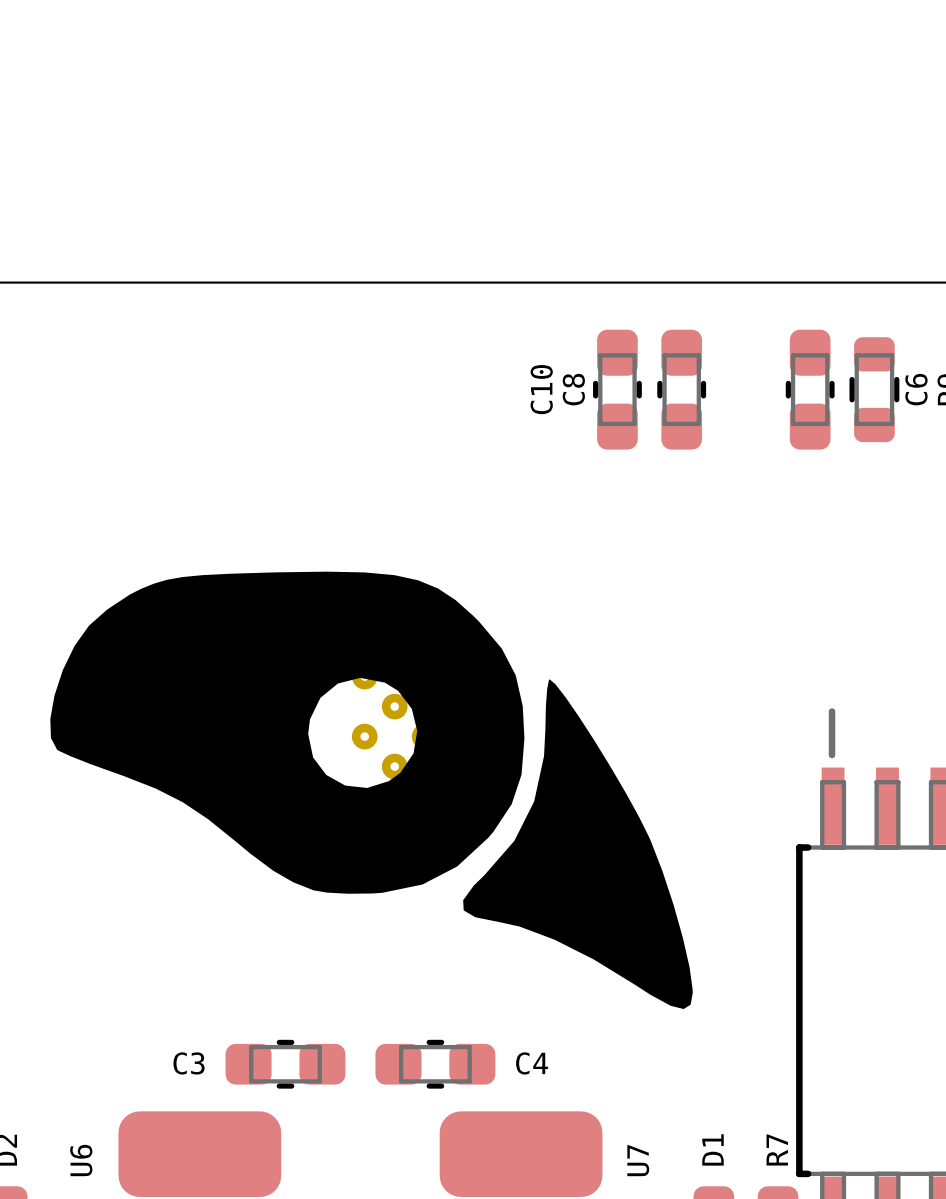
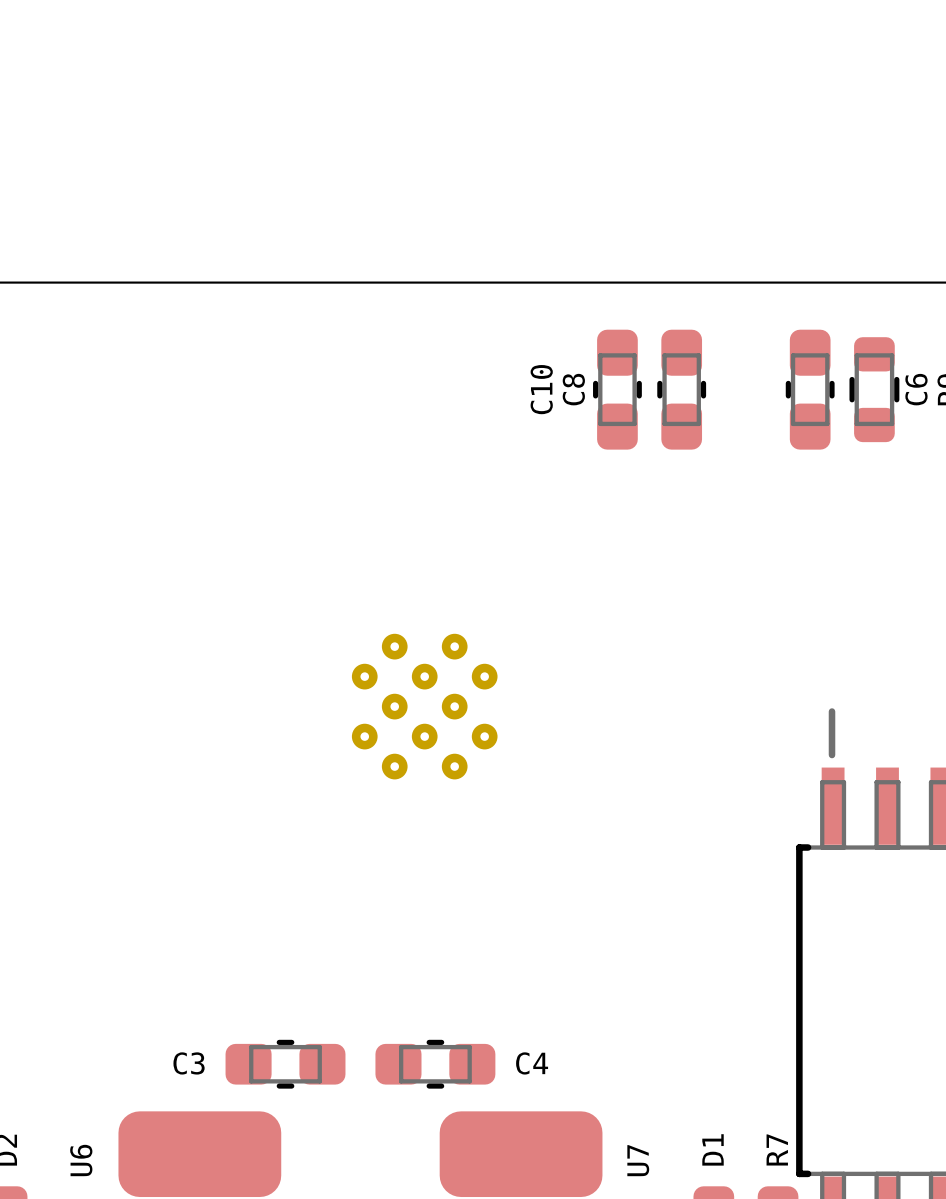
drawing: [50, 571, 693, 1010] -> none

